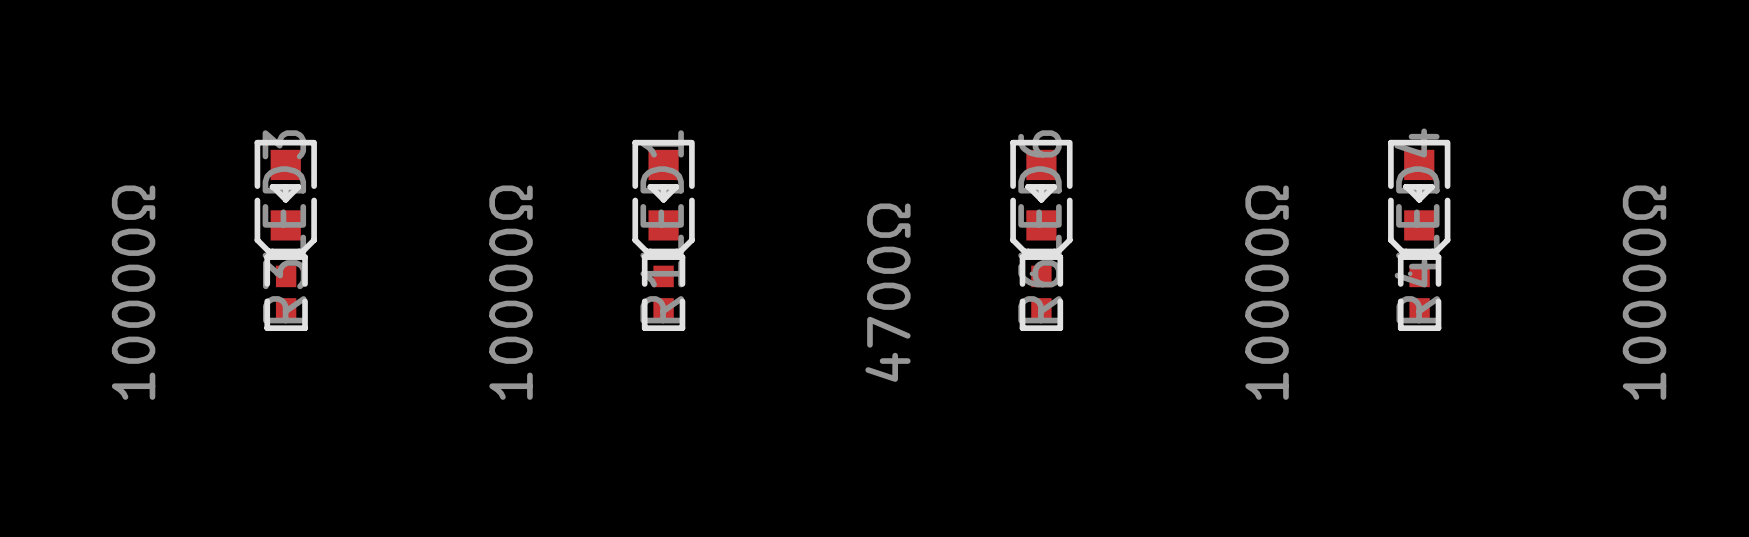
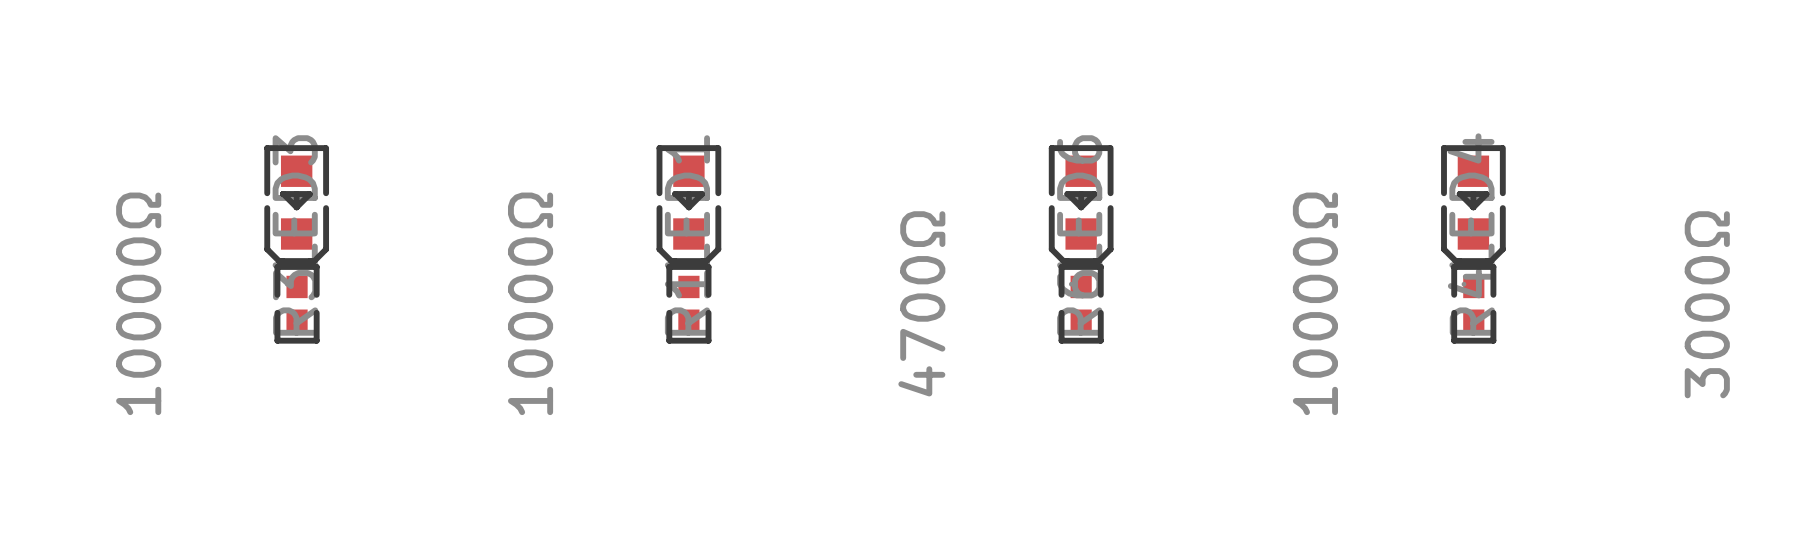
part value: 10000Ω (1644, 292) -> 3000Ω (1707, 304)

